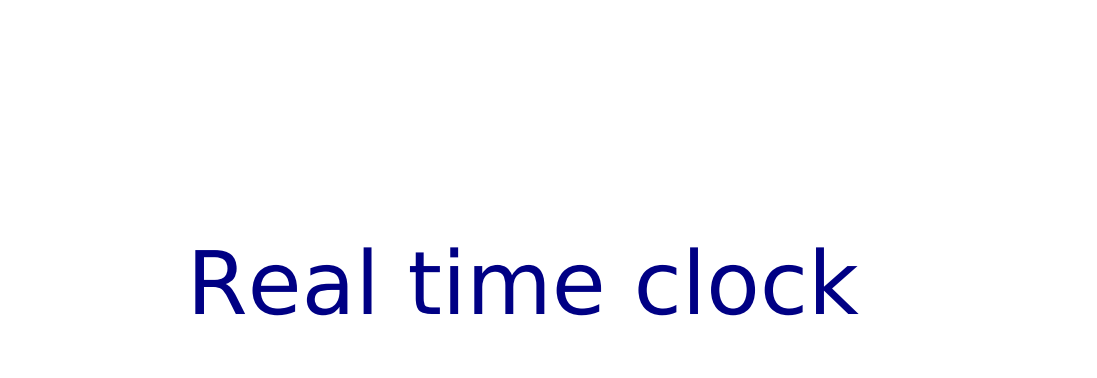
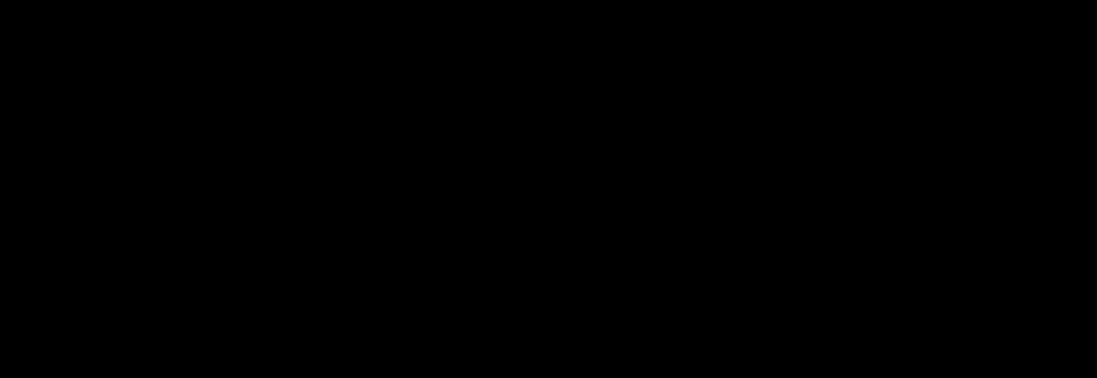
text: Real time clock (526, 281) -> none

